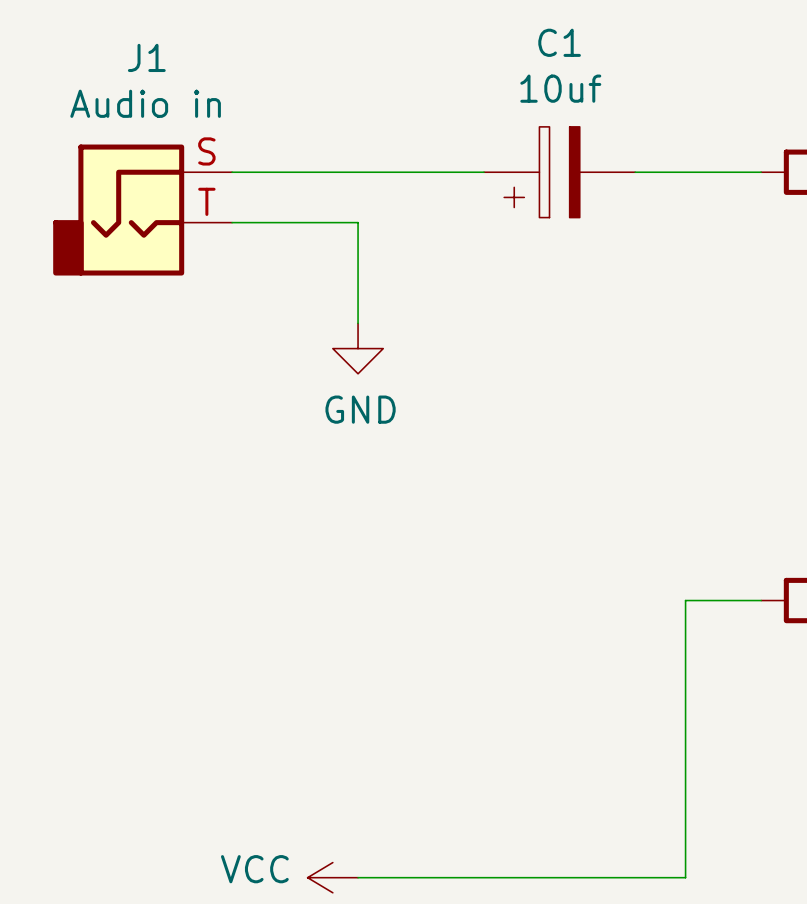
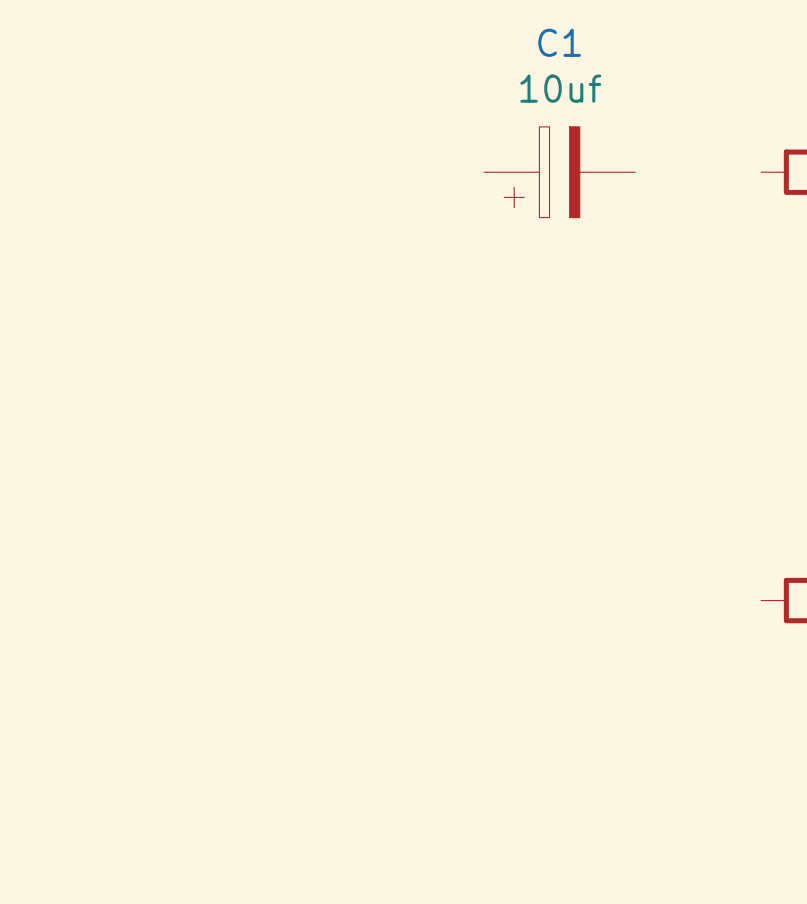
wire: (232, 172) (484, 172) -> none
wire: (635, 172) (761, 172) -> none
J1: Audio in (142, 210) -> none
wire: (232, 222) (358, 222) (358, 323) -> none
power symbol: GND (358, 348) -> none
wire: (761, 600) (685, 600) (685, 877) (358, 877) -> none
power symbol: VCC (332, 877) -> none

